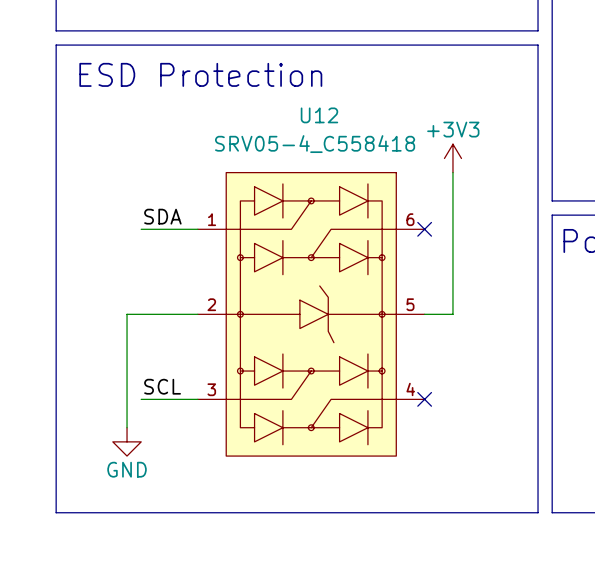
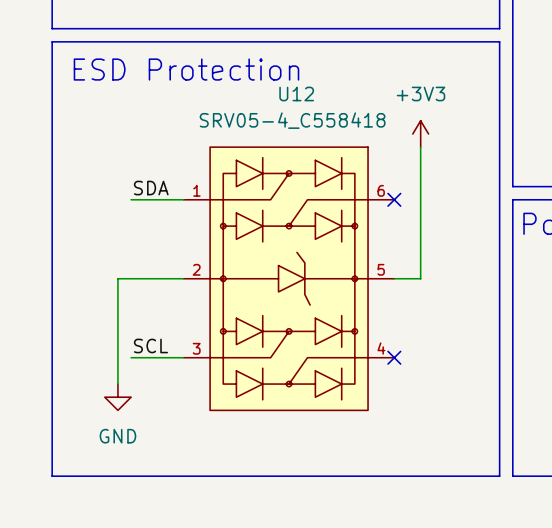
power symbol text position: +3V3 (453, 129) -> +3V3 (420, 94)
power symbol position: +3V3 (452, 158) -> +3V3 (420, 133)
label position: SDA (162, 216) -> SDA (151, 188)
wire: (141, 229) (197, 229) -> (131, 199) (183, 199)
no-connect mark position: (424, 229) -> (394, 199)
wire: (452, 300) (452, 314) (424, 314) -> (420, 278) (394, 278)
wire: (127, 314) (197, 314) -> (117, 291) (117, 278) (183, 278)
U12 position: (311, 314) -> (289, 278)
label position: SCL (162, 386) -> SCL (150, 345)
wire: (141, 399) (197, 399) -> (131, 357) (183, 357)
no-connect mark position: (424, 399) -> (394, 357)
power symbol position: GND (127, 441) -> GND (117, 397)

